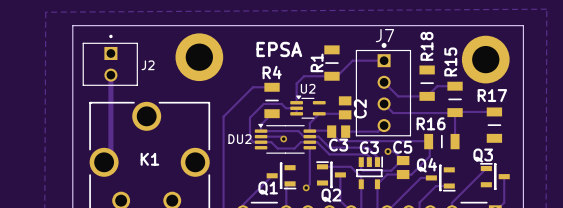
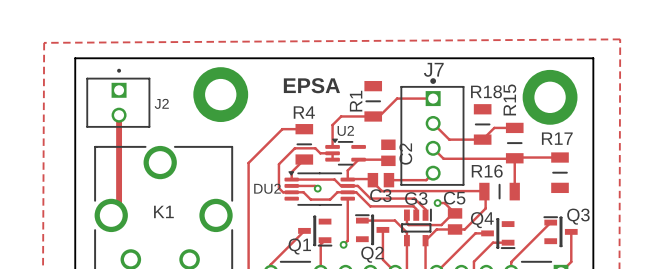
R18 name rotation: 0° (426, 46) -> 90° clockwise (486, 91)
Q3 name position: Q3 (483, 155) -> Q3 (578, 216)

